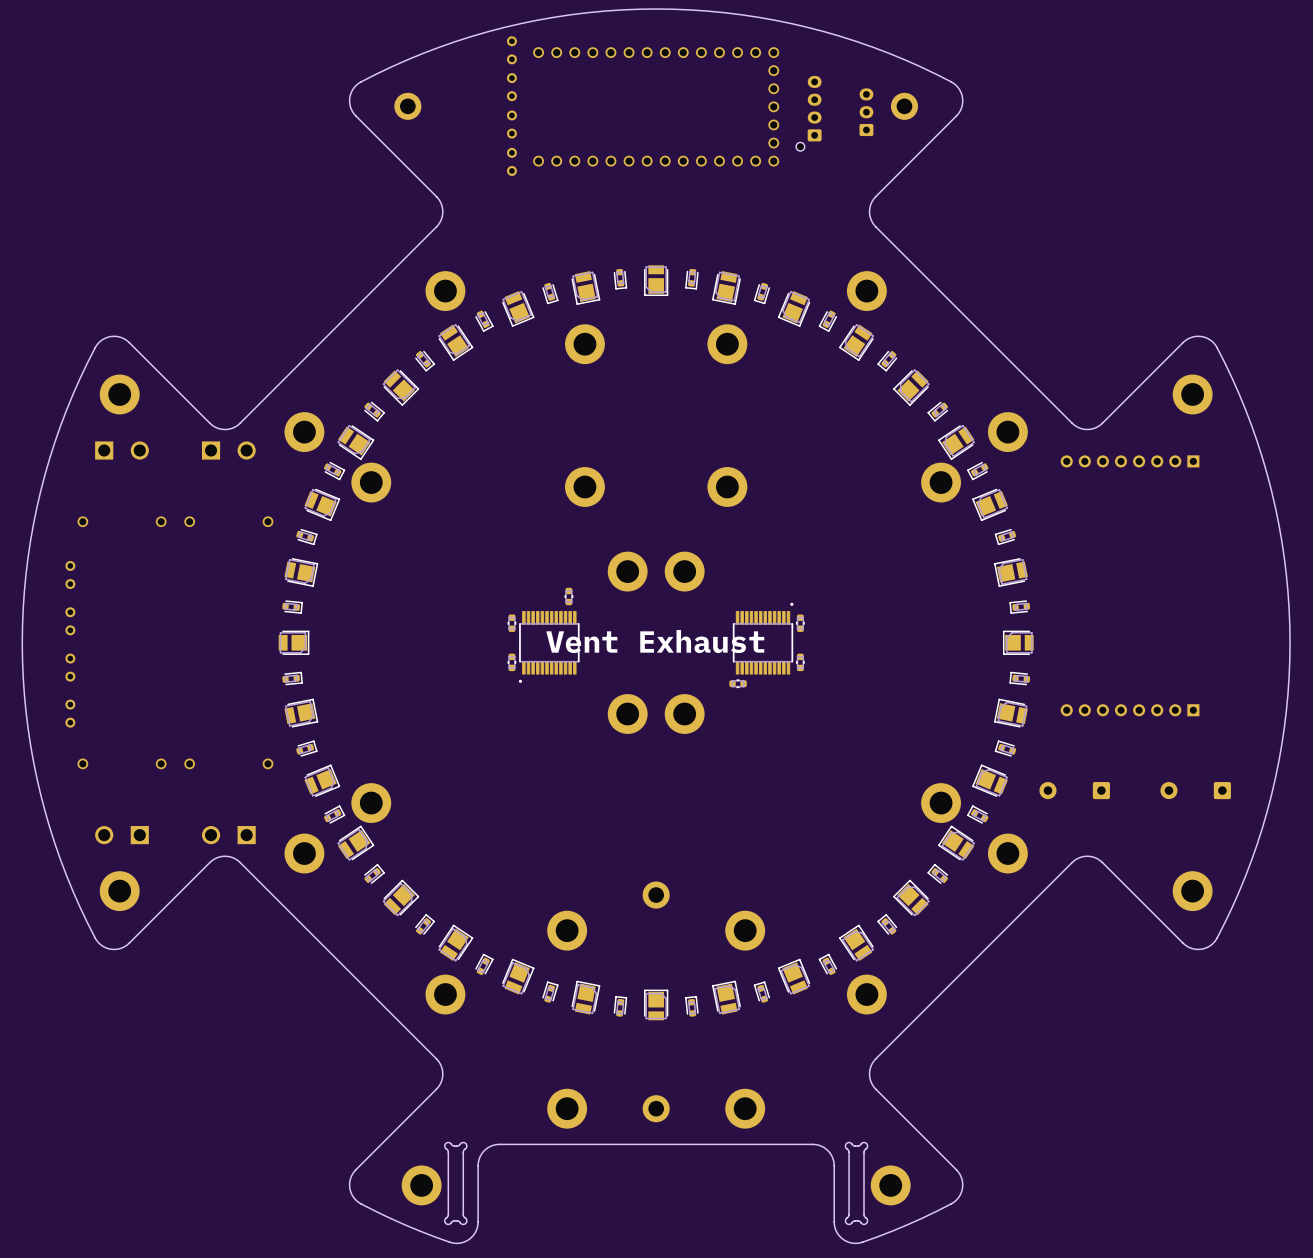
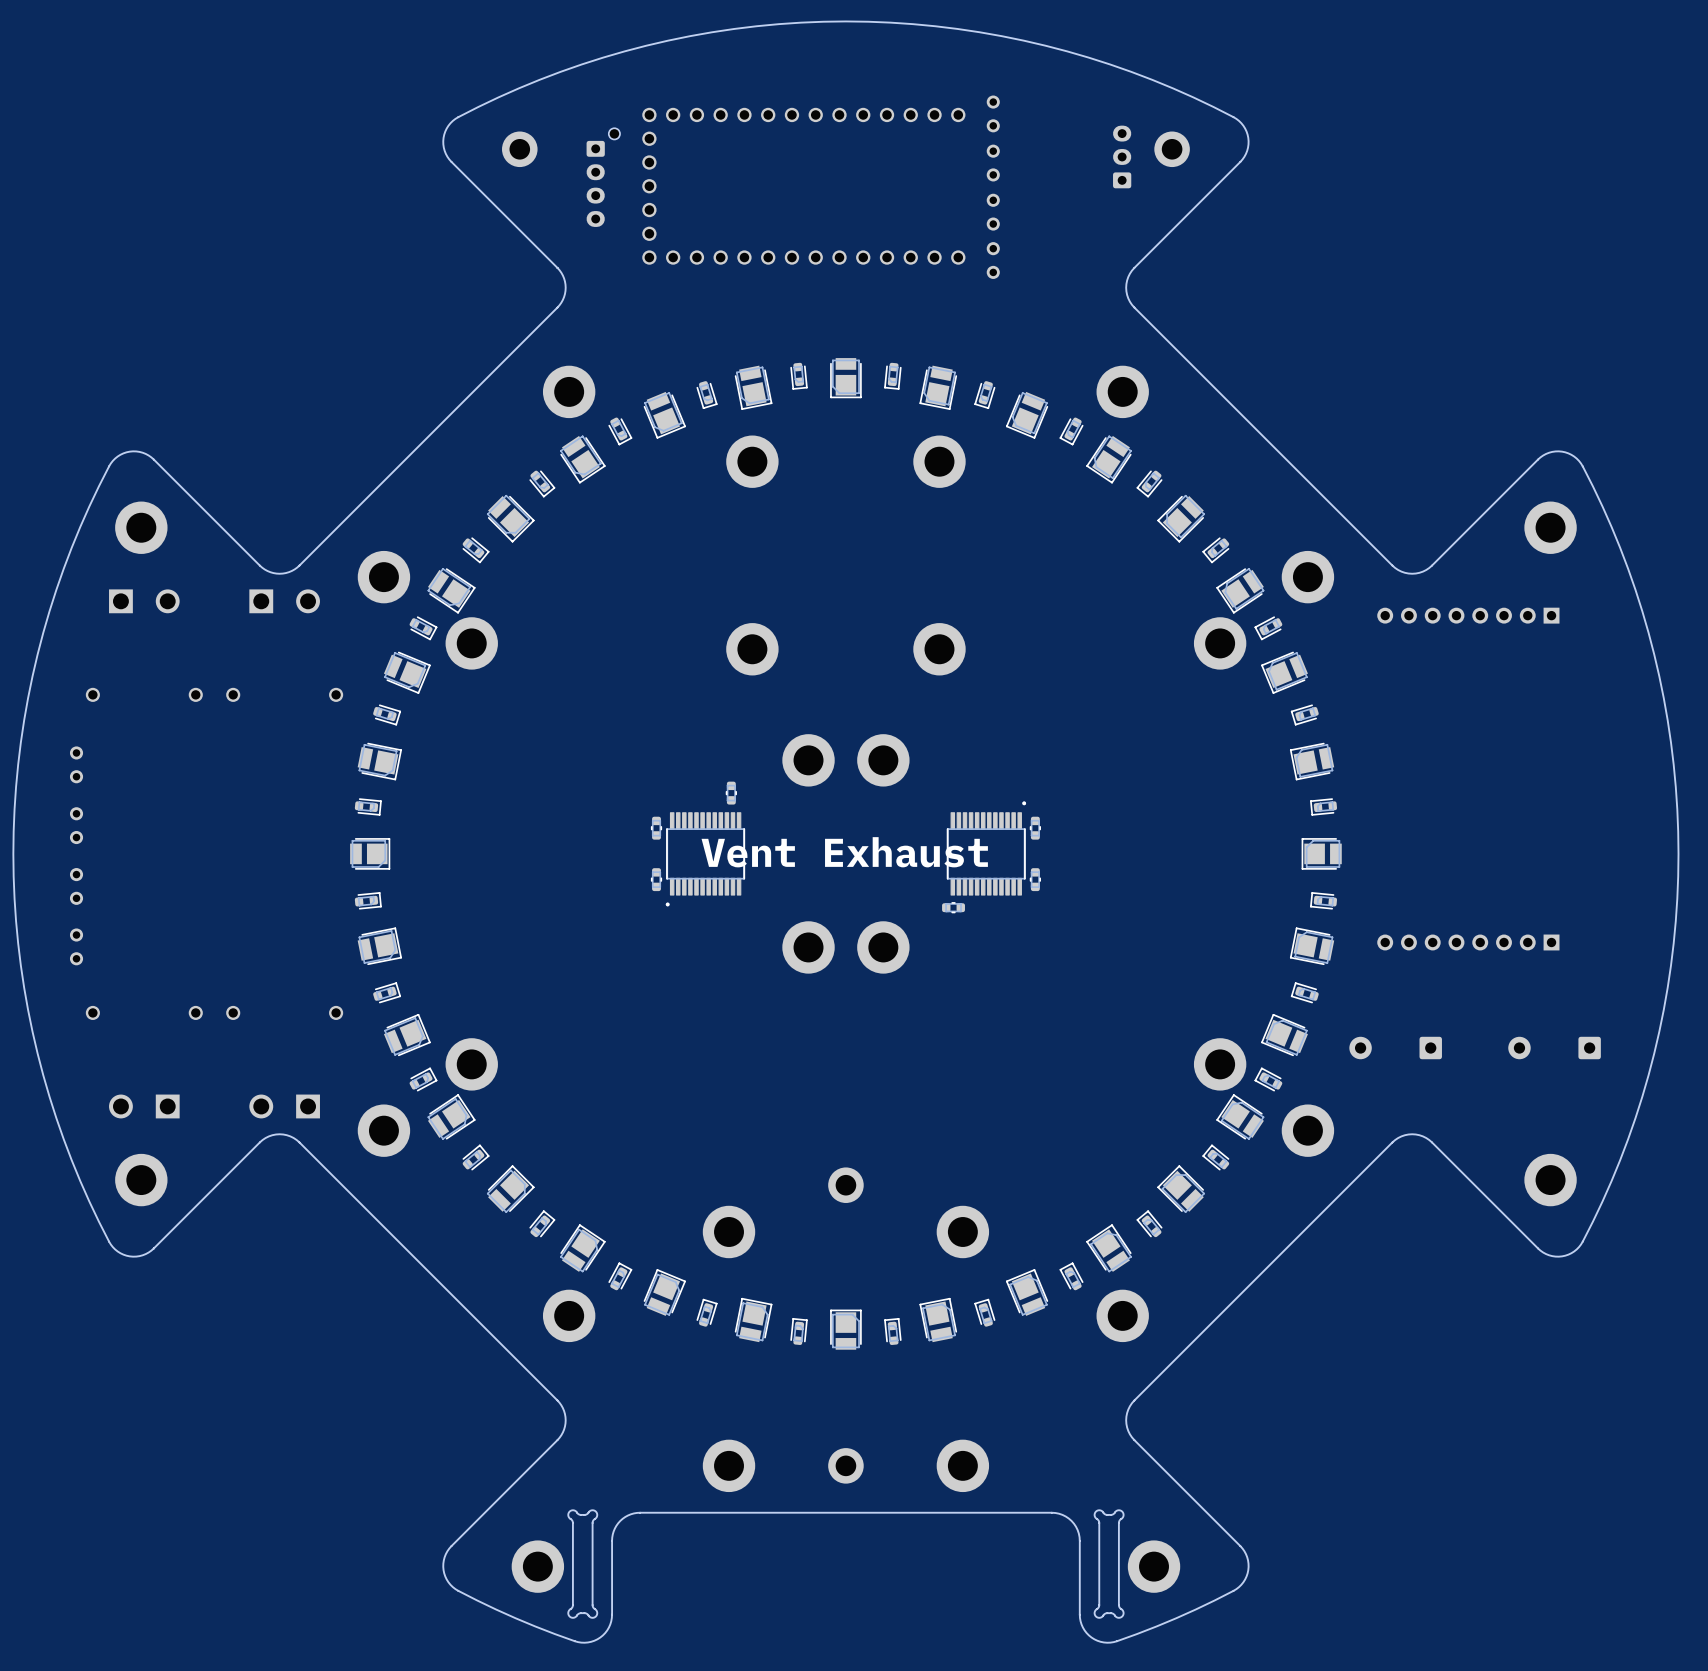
part: (511, 50) -> none
part: none -> (993, 113)
part: (511, 87) -> none
part rotation: 0° (656, 106) -> 180° (803, 186)
part: (808, 113) -> none
part: none -> (993, 163)
part: (511, 124) -> none
part: none -> (603, 177)
part: none -> (993, 212)
part: (511, 161) -> none
part: none -> (993, 260)

